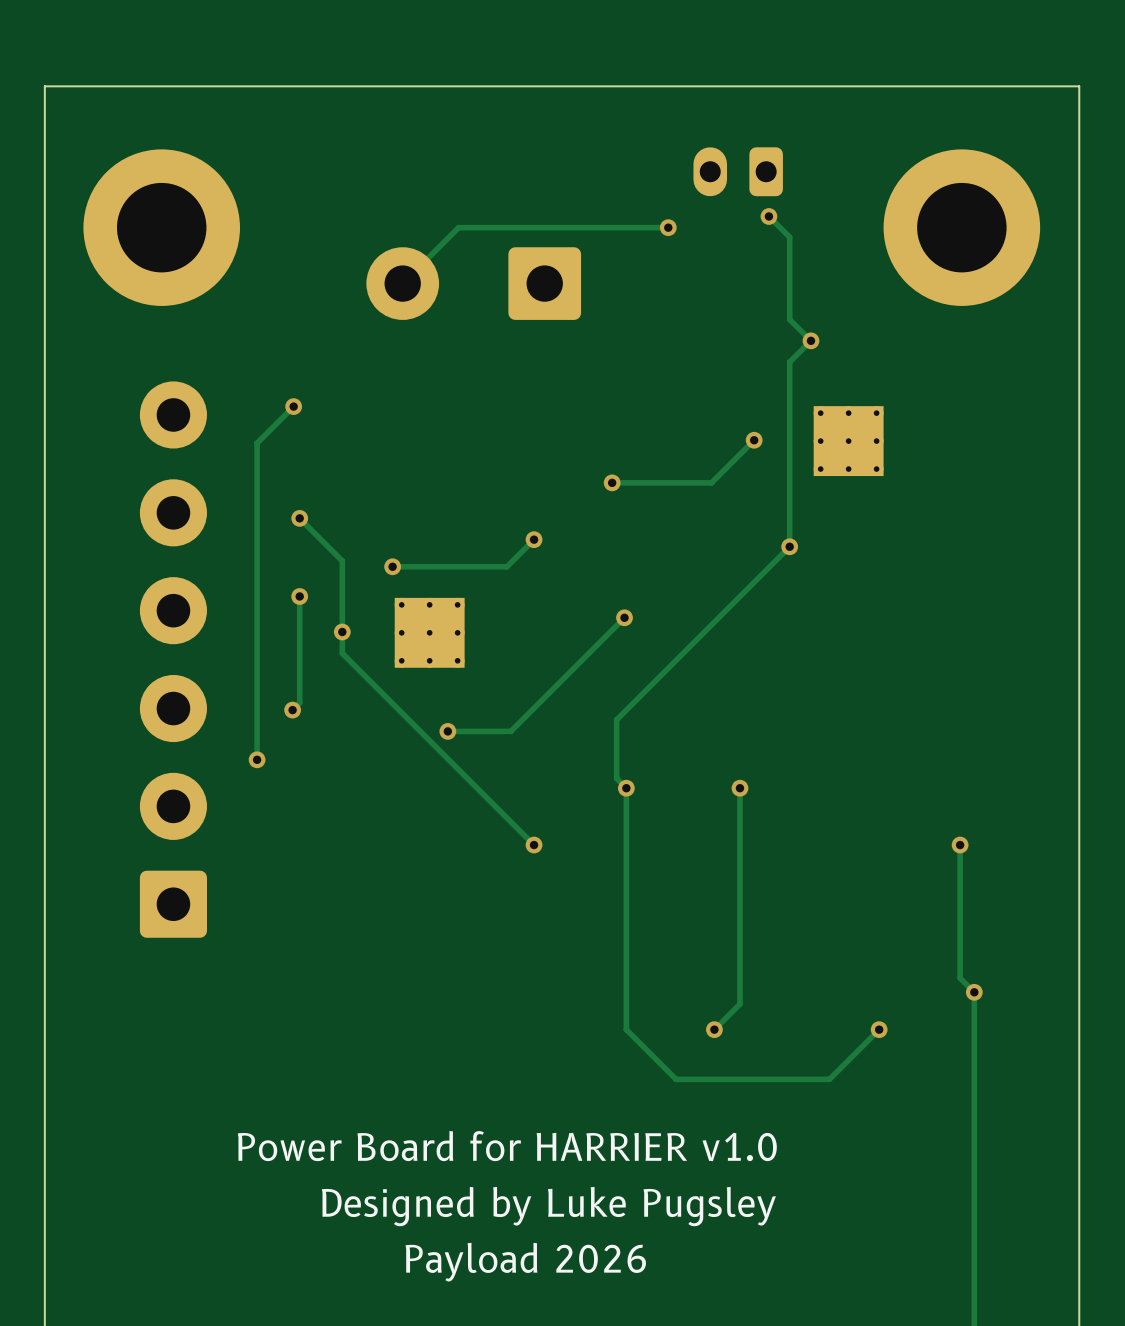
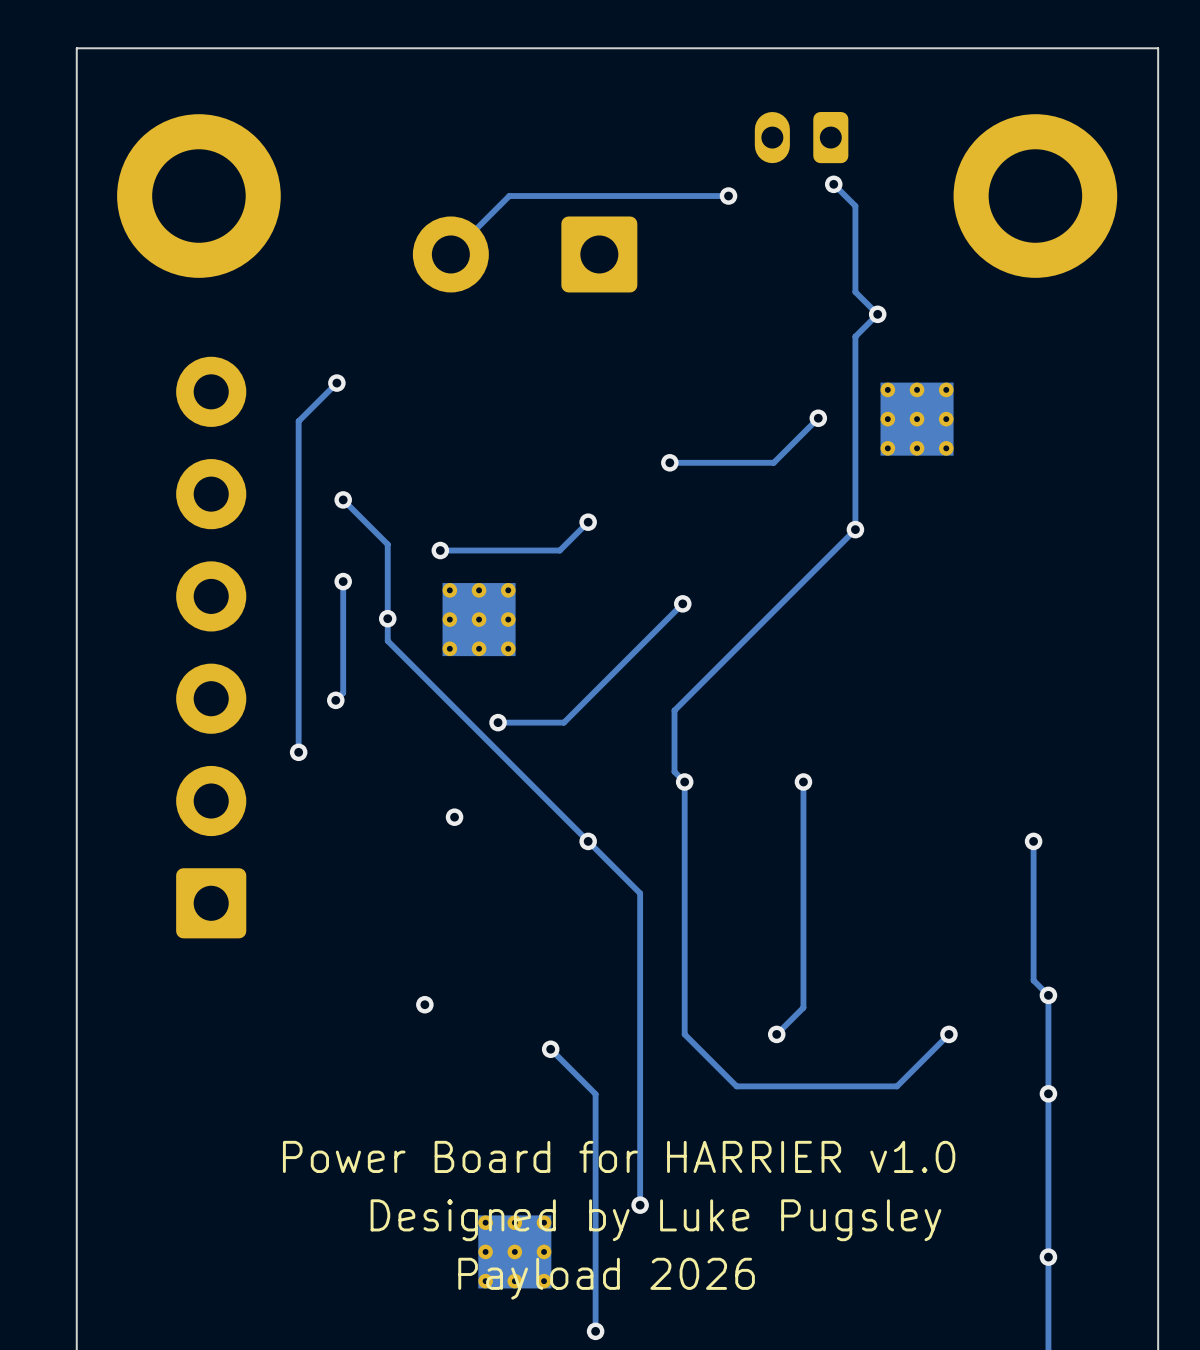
via: none -> (454, 817)
track: none -> (588, 841) (640, 893) (640, 1205)
via: none -> (424, 1004)
track: none -> (550, 1049) (595, 1094) (595, 1331)
via: none -> (550, 1049)
via: none -> (1048, 1093)
via: none -> (640, 1205)
part: none -> (514, 1251)
via: none -> (1048, 1257)
via: none -> (595, 1331)

